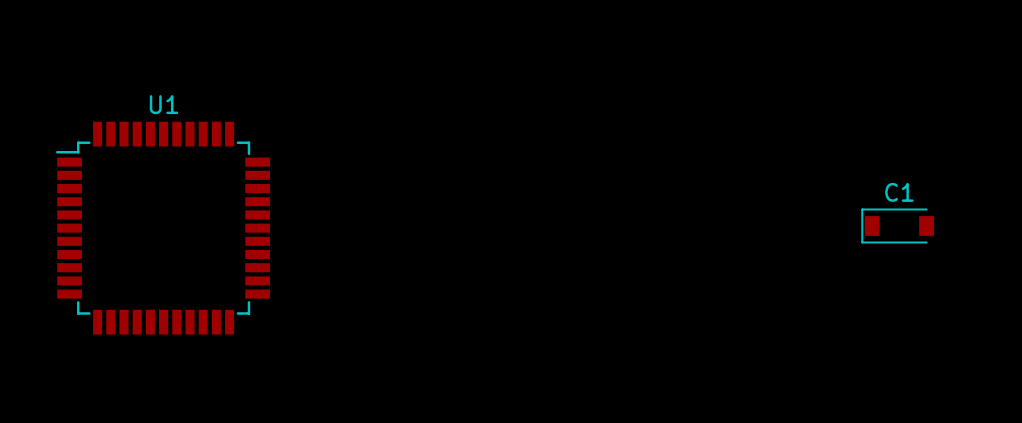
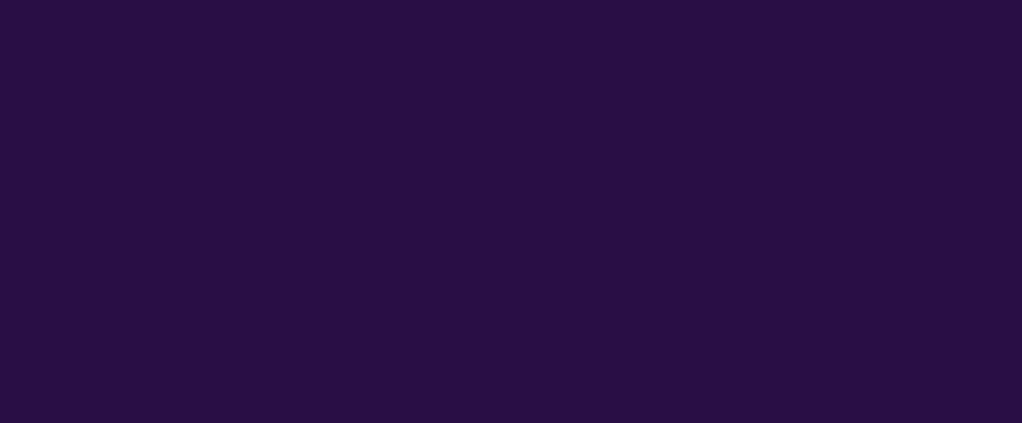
C1: (897, 225) -> none
U1: (162, 228) -> none

